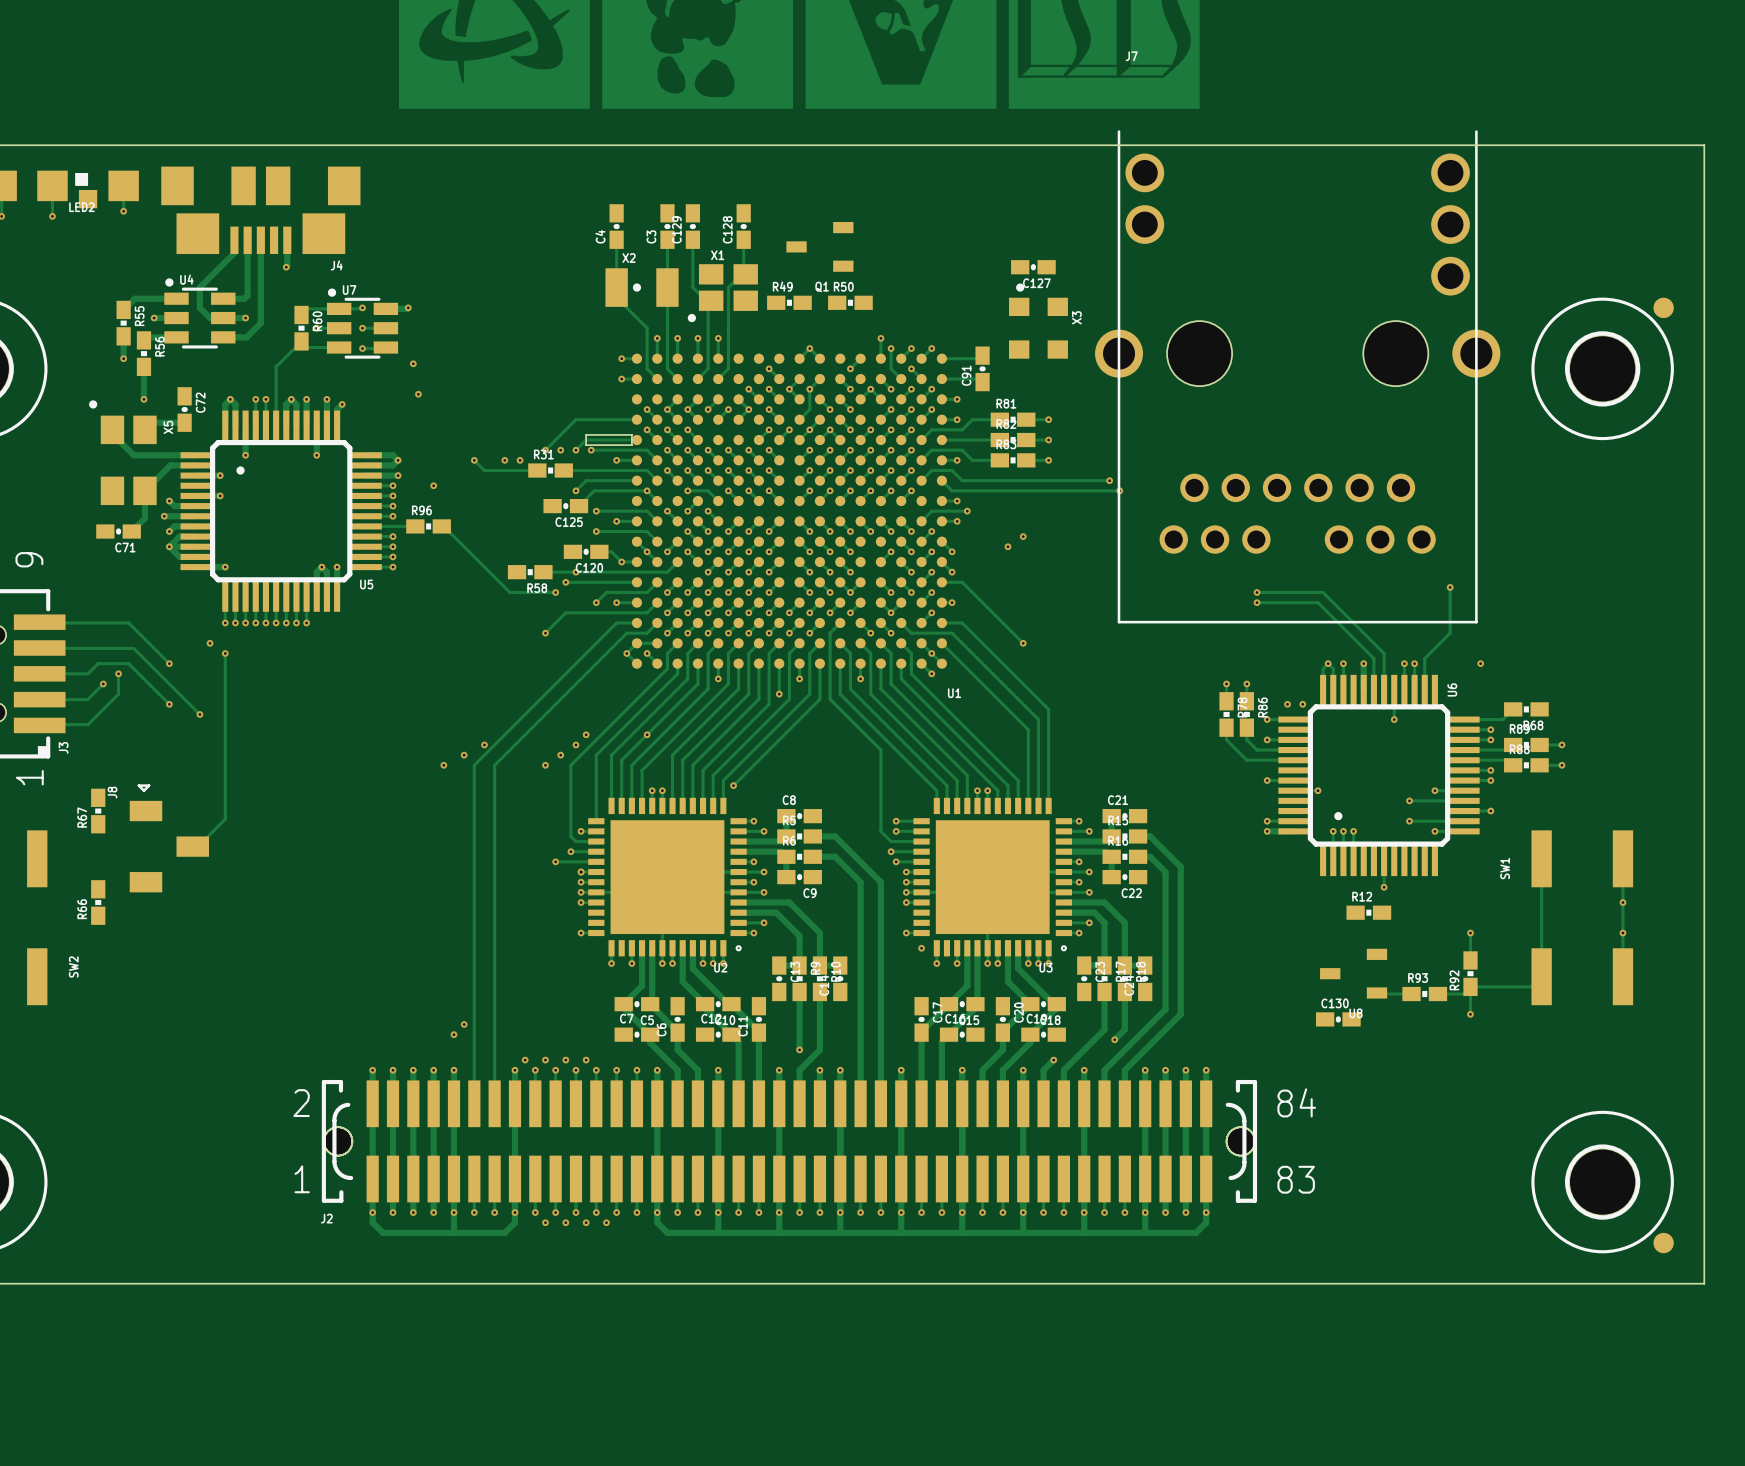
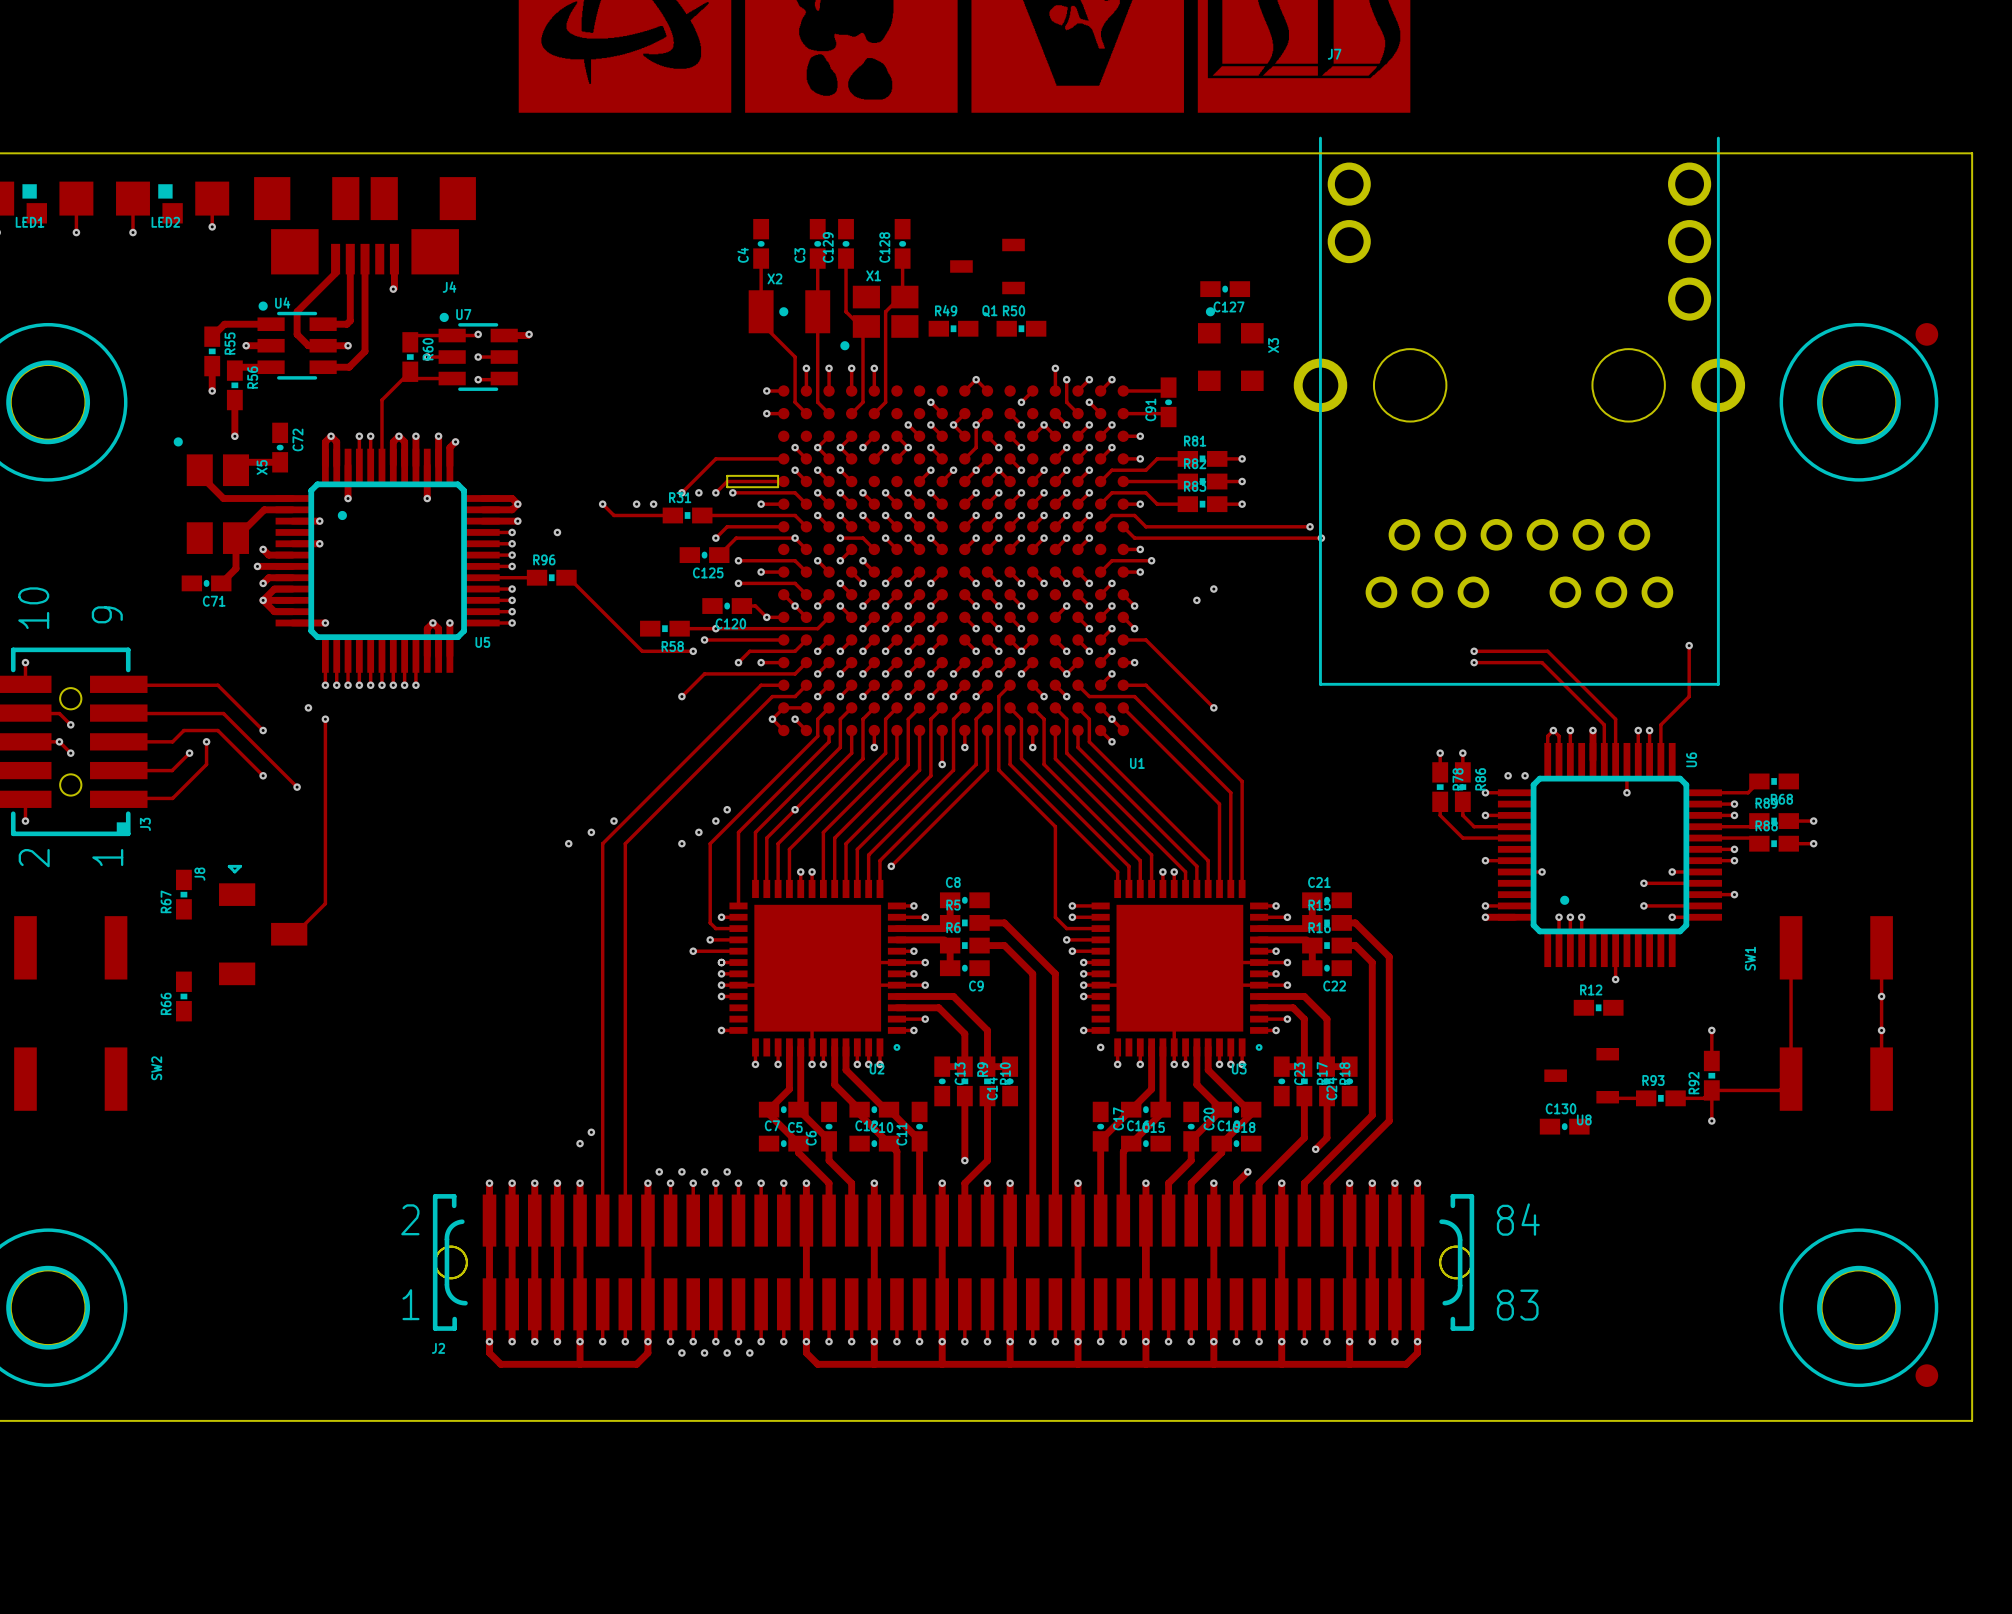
via: (413, 363) -> none
via: (418, 394) -> none
via: (1480, 663) -> none

